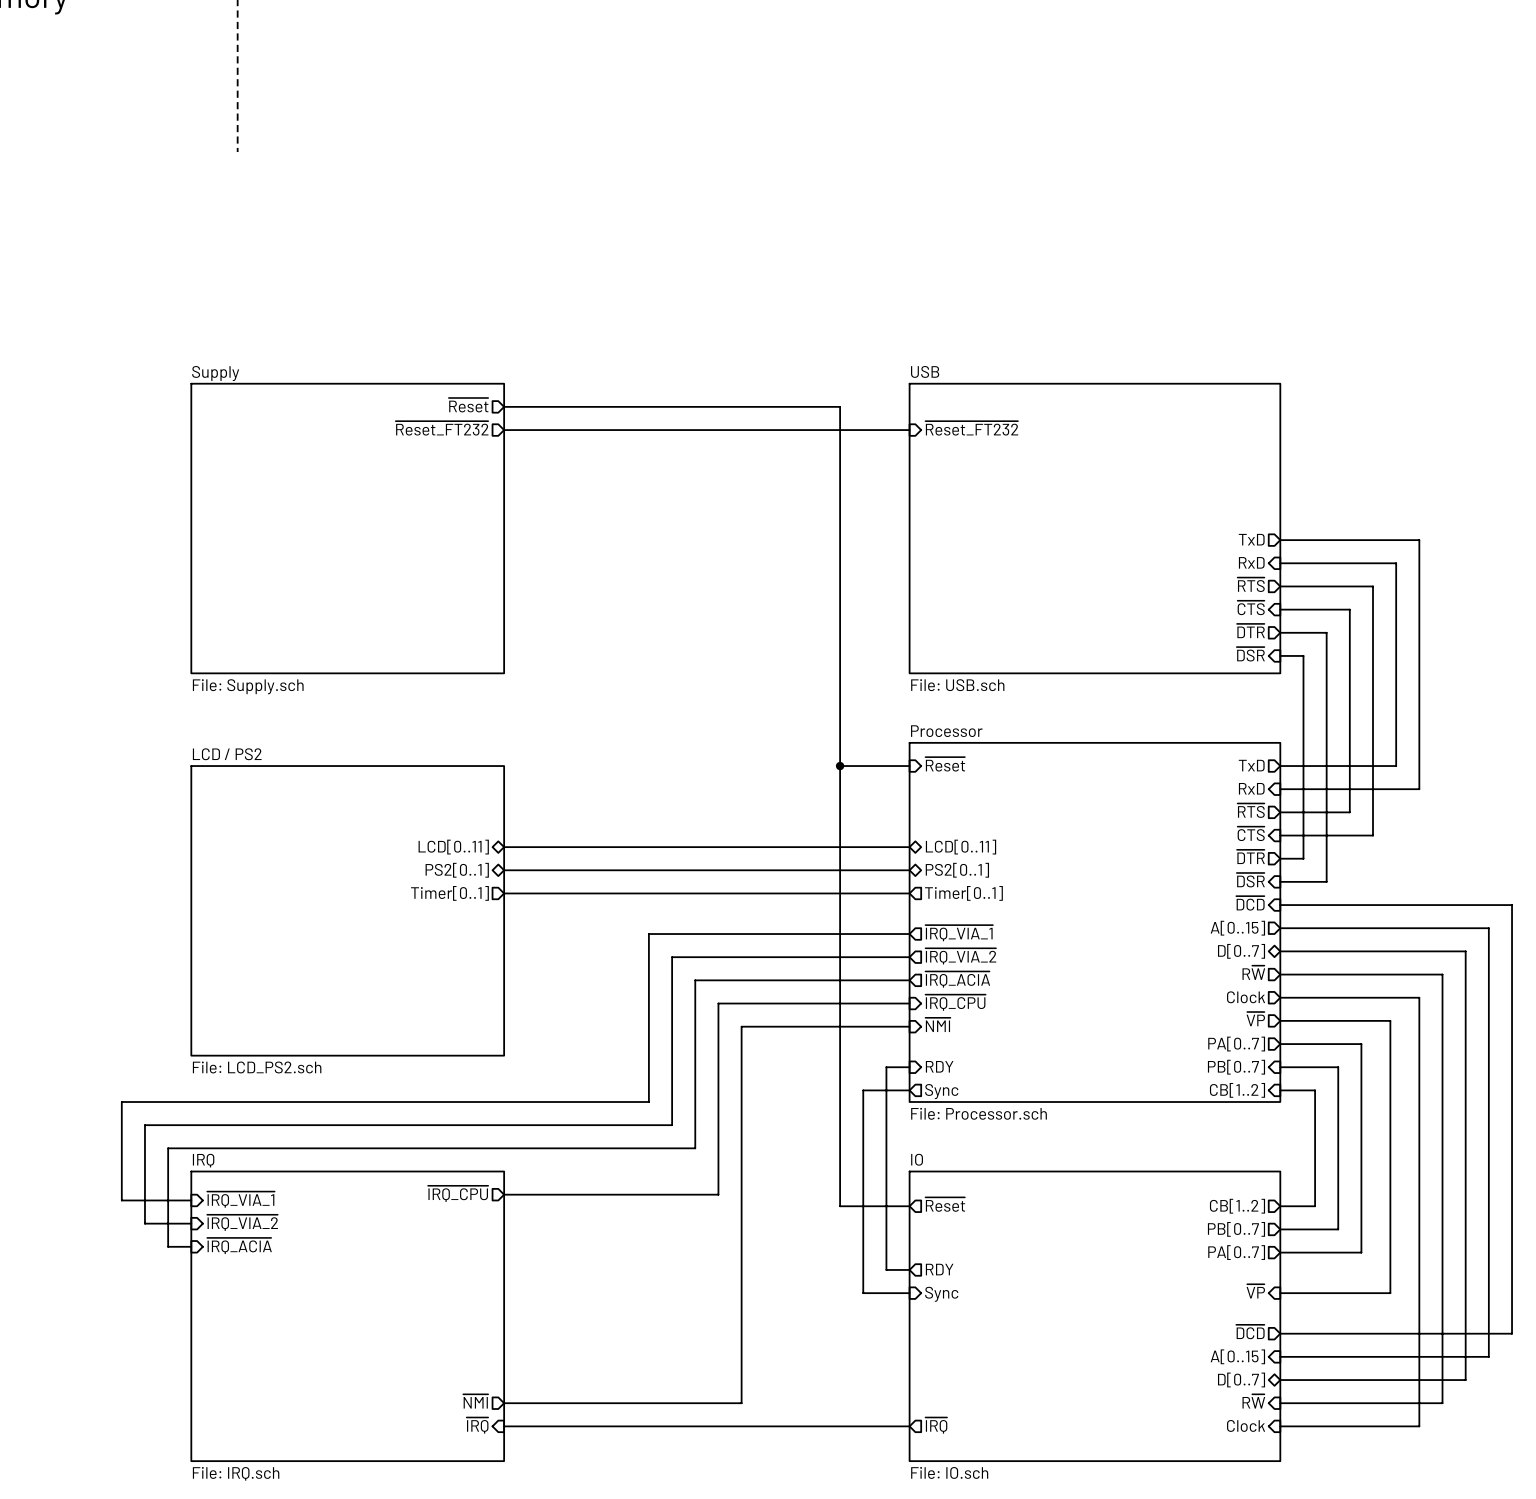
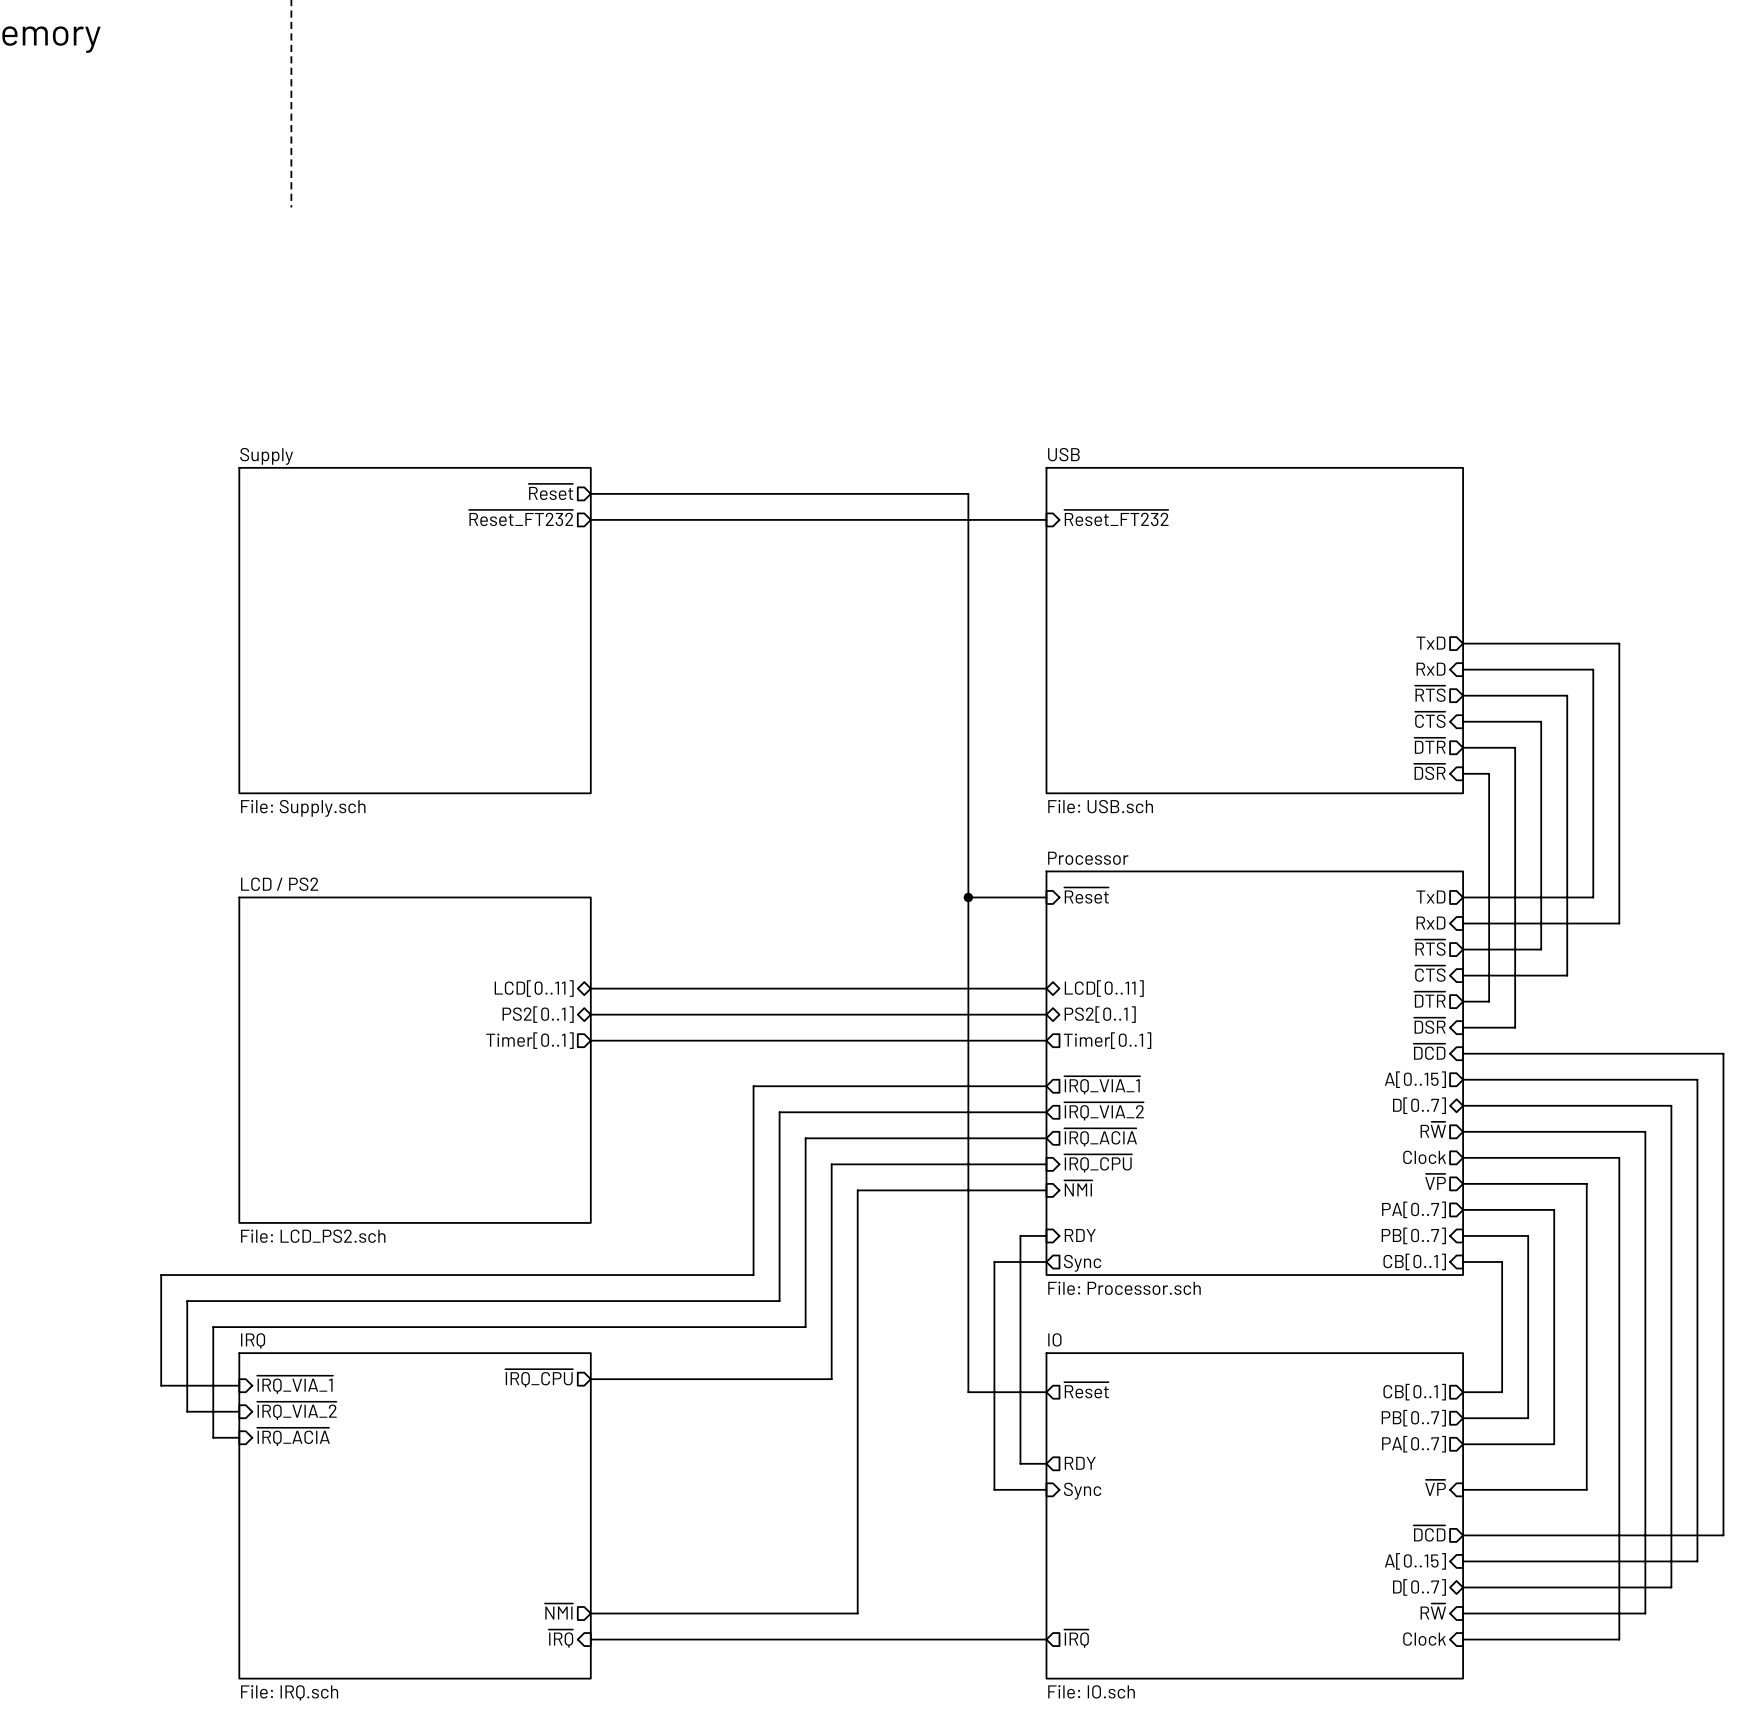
sheet pin: CB[1..2] (1237, 1090) -> CB[0..1] (1414, 1261)
sheet pin: CB[1..2] (1237, 1206) -> CB[0..1] (1414, 1392)

